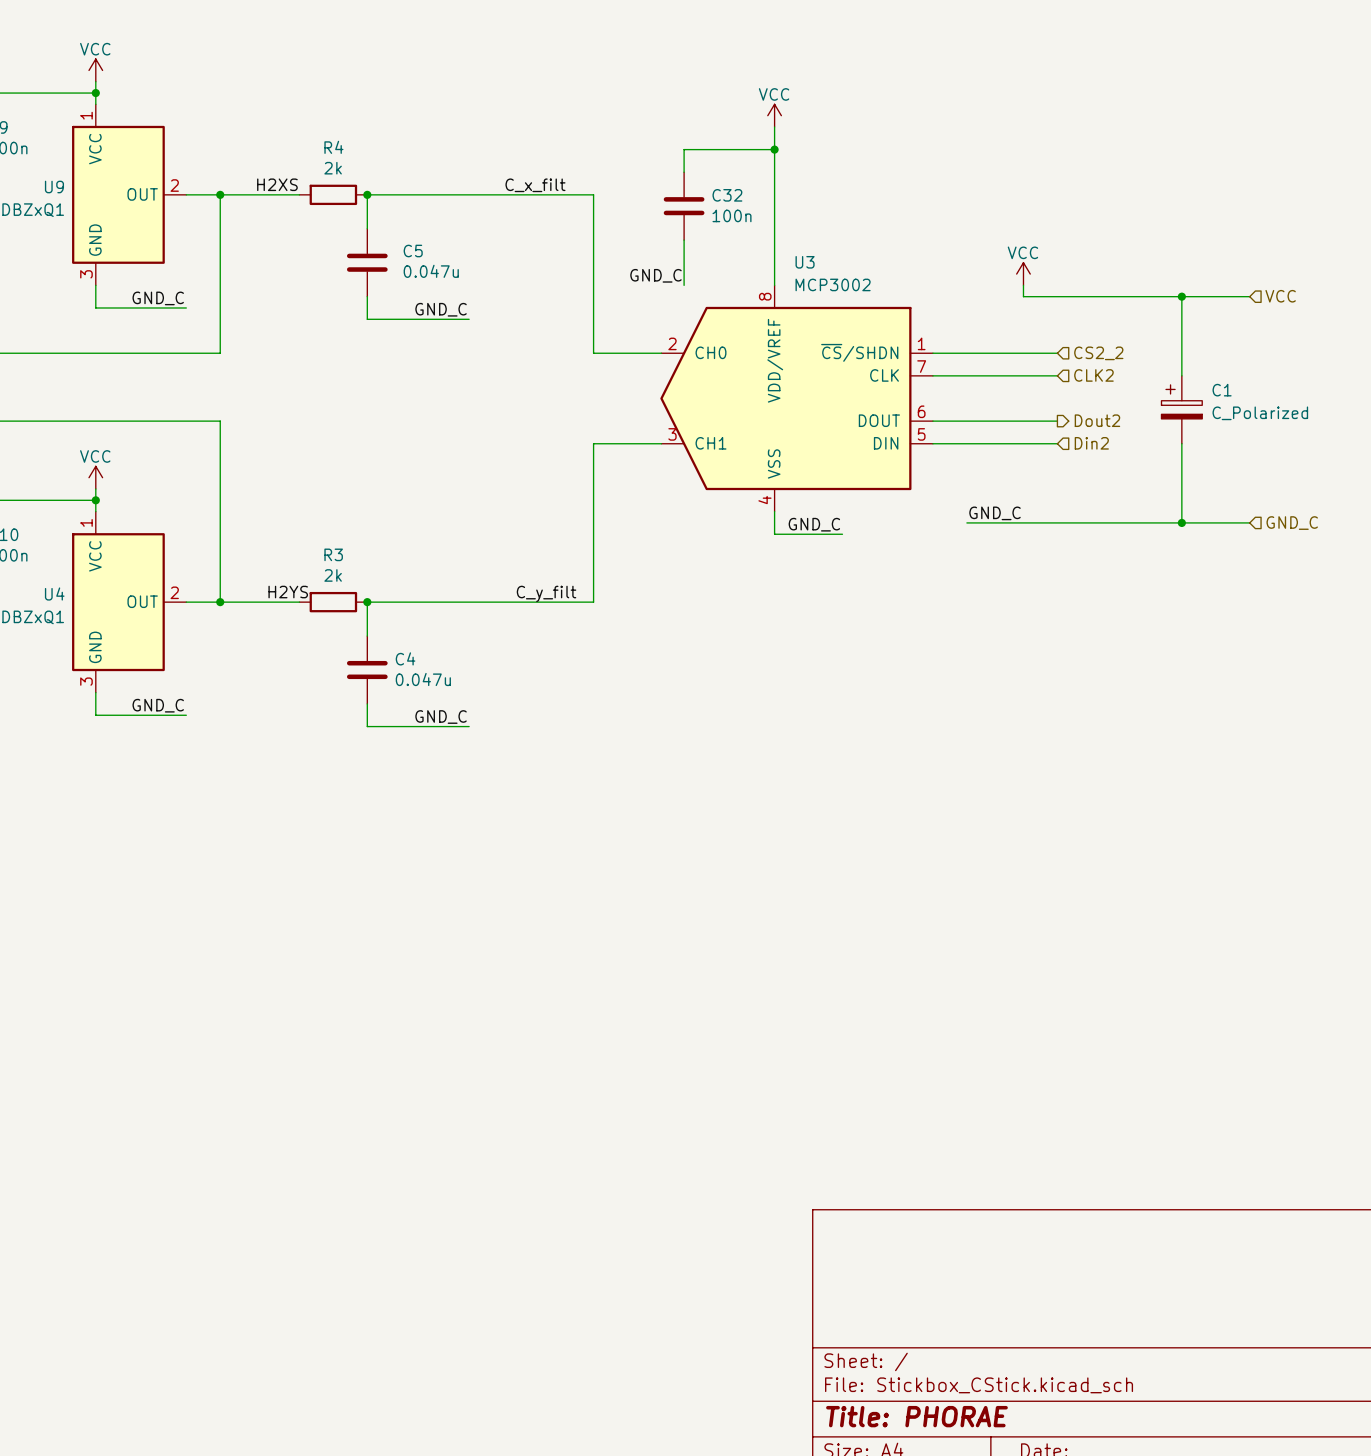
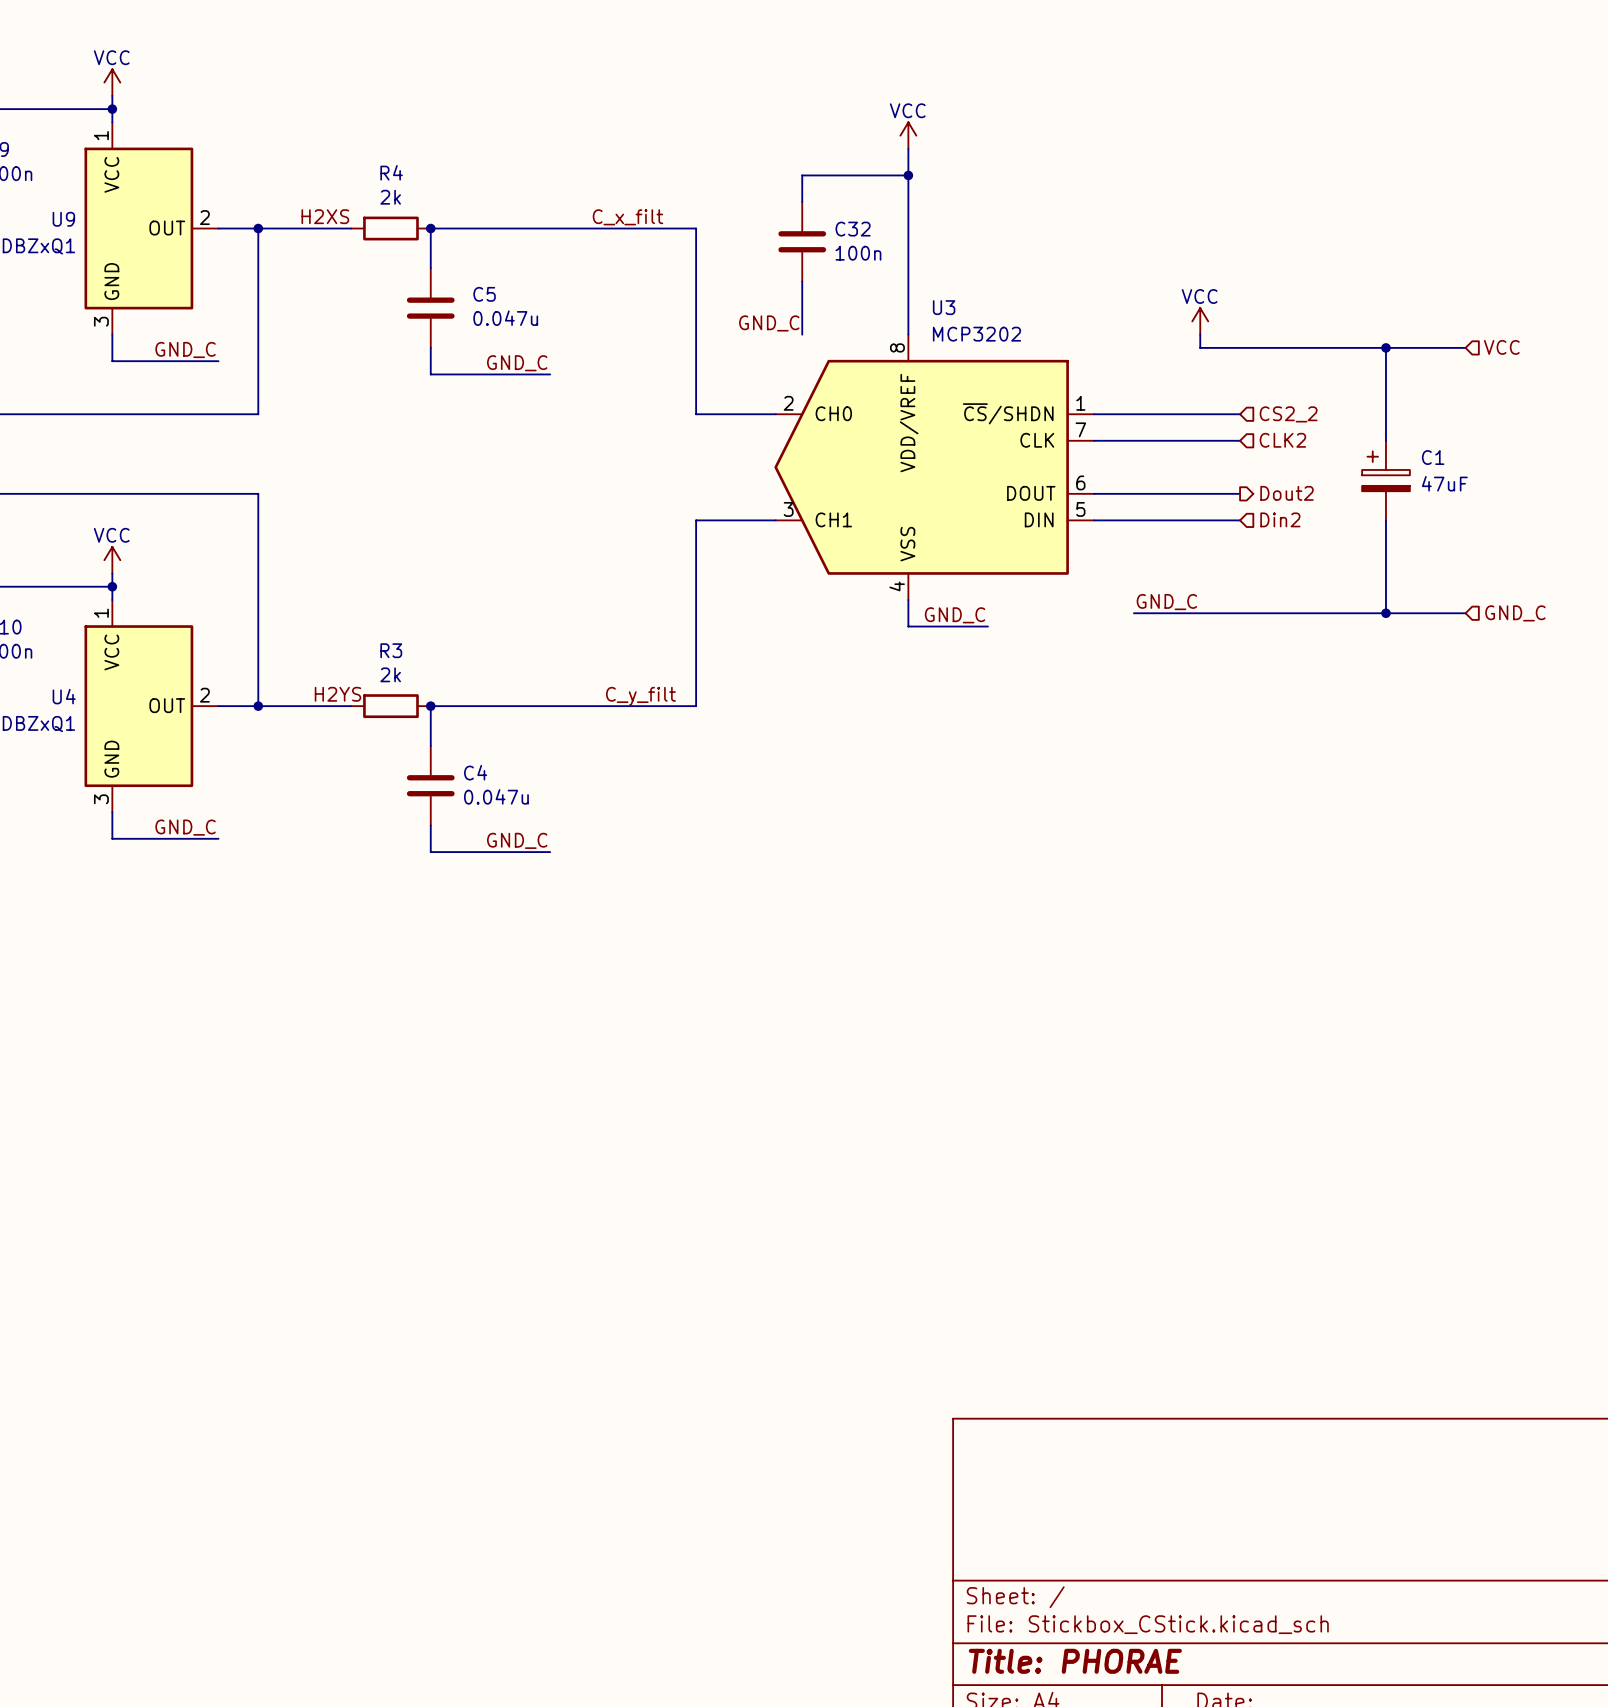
U3 value: MCP3002 (833, 284) -> MCP3202 (976, 334)
C1 value: C_Polarized (1260, 413) -> 47uF (1444, 483)

